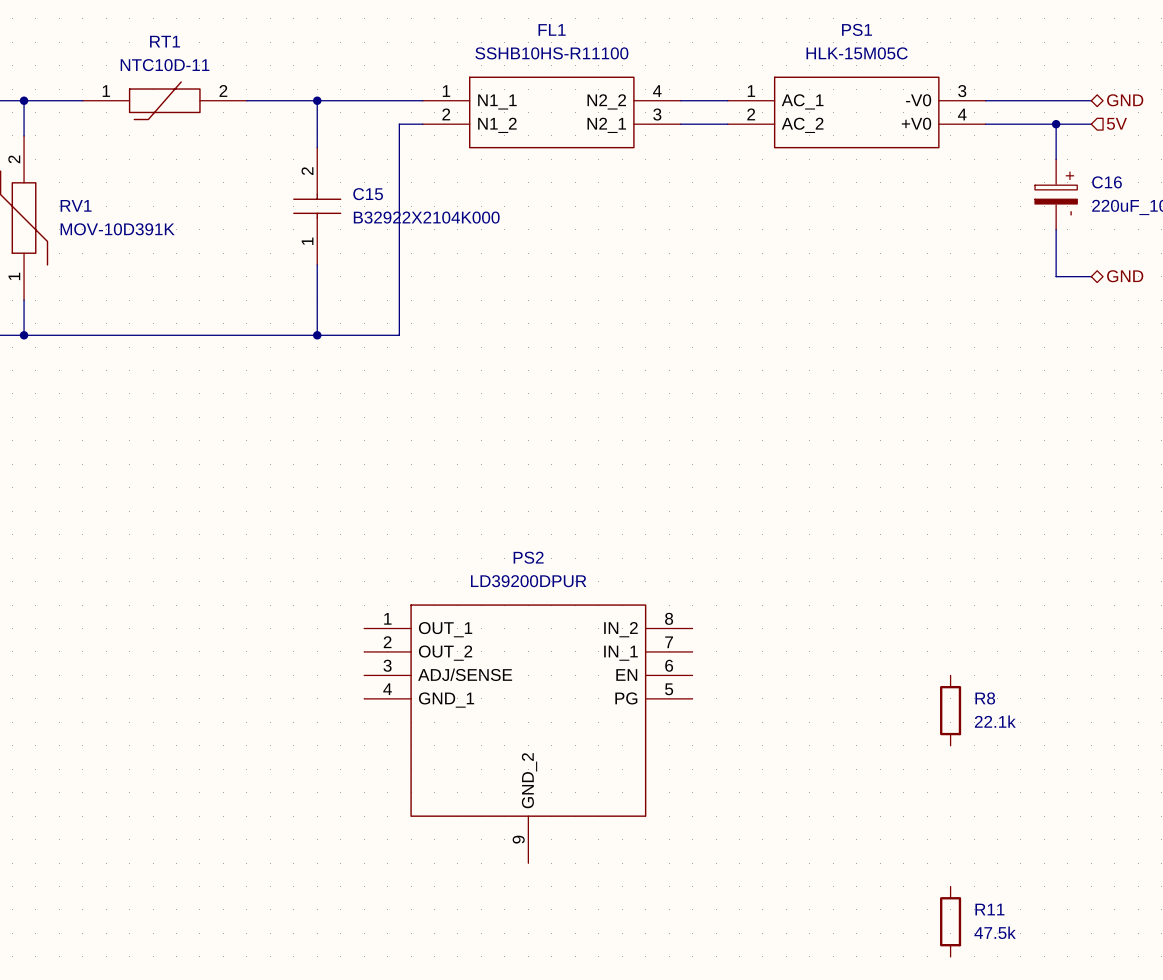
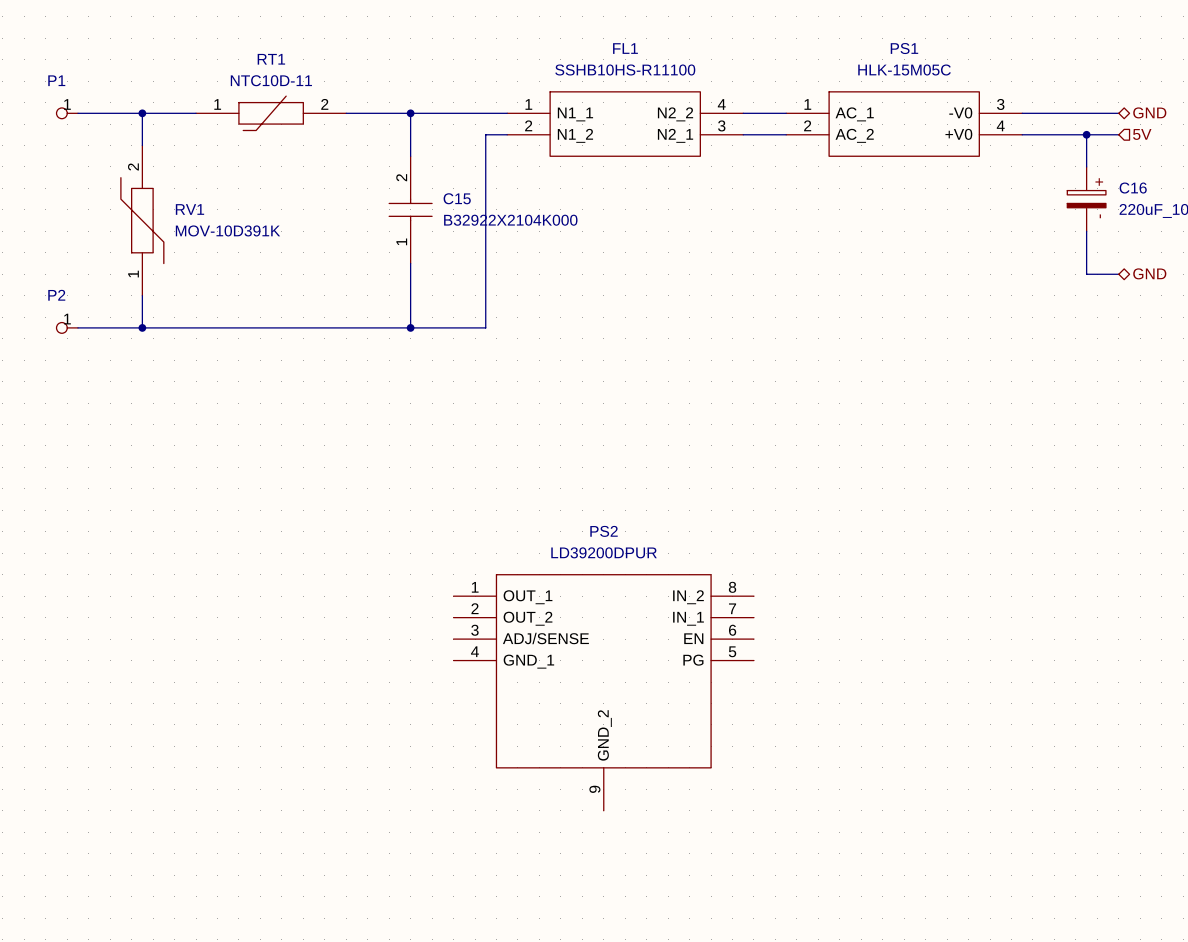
R8: 22.1k (950, 710) -> none
R11: 47.5k (950, 921) -> none

